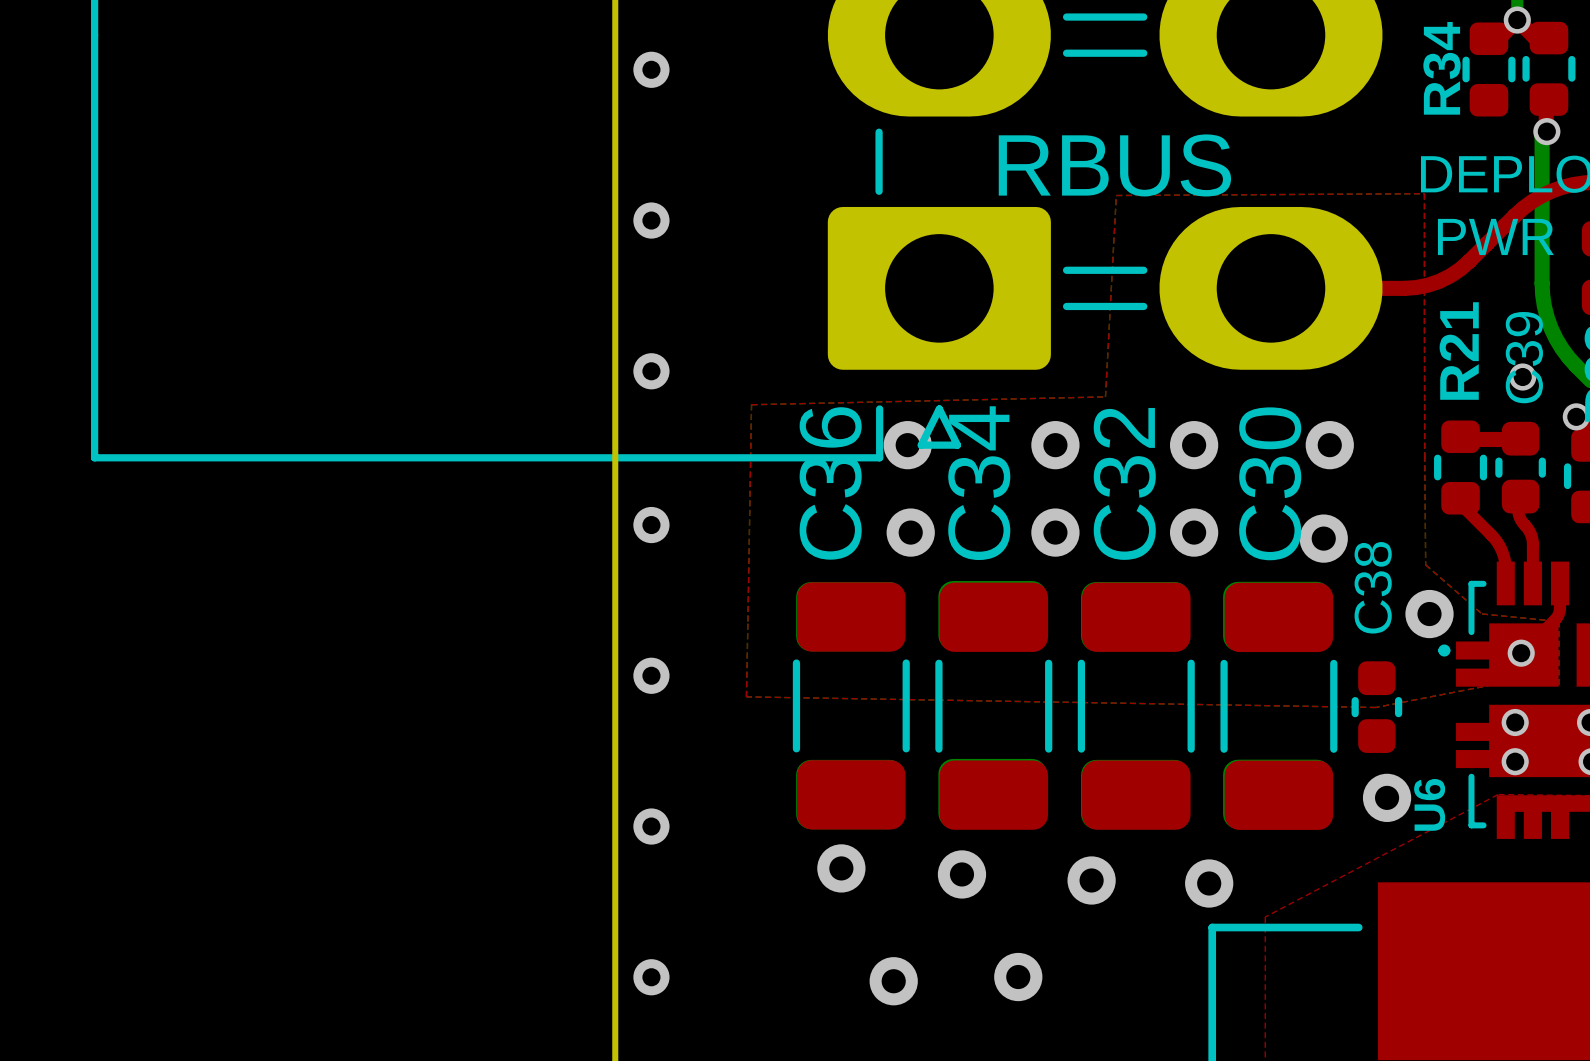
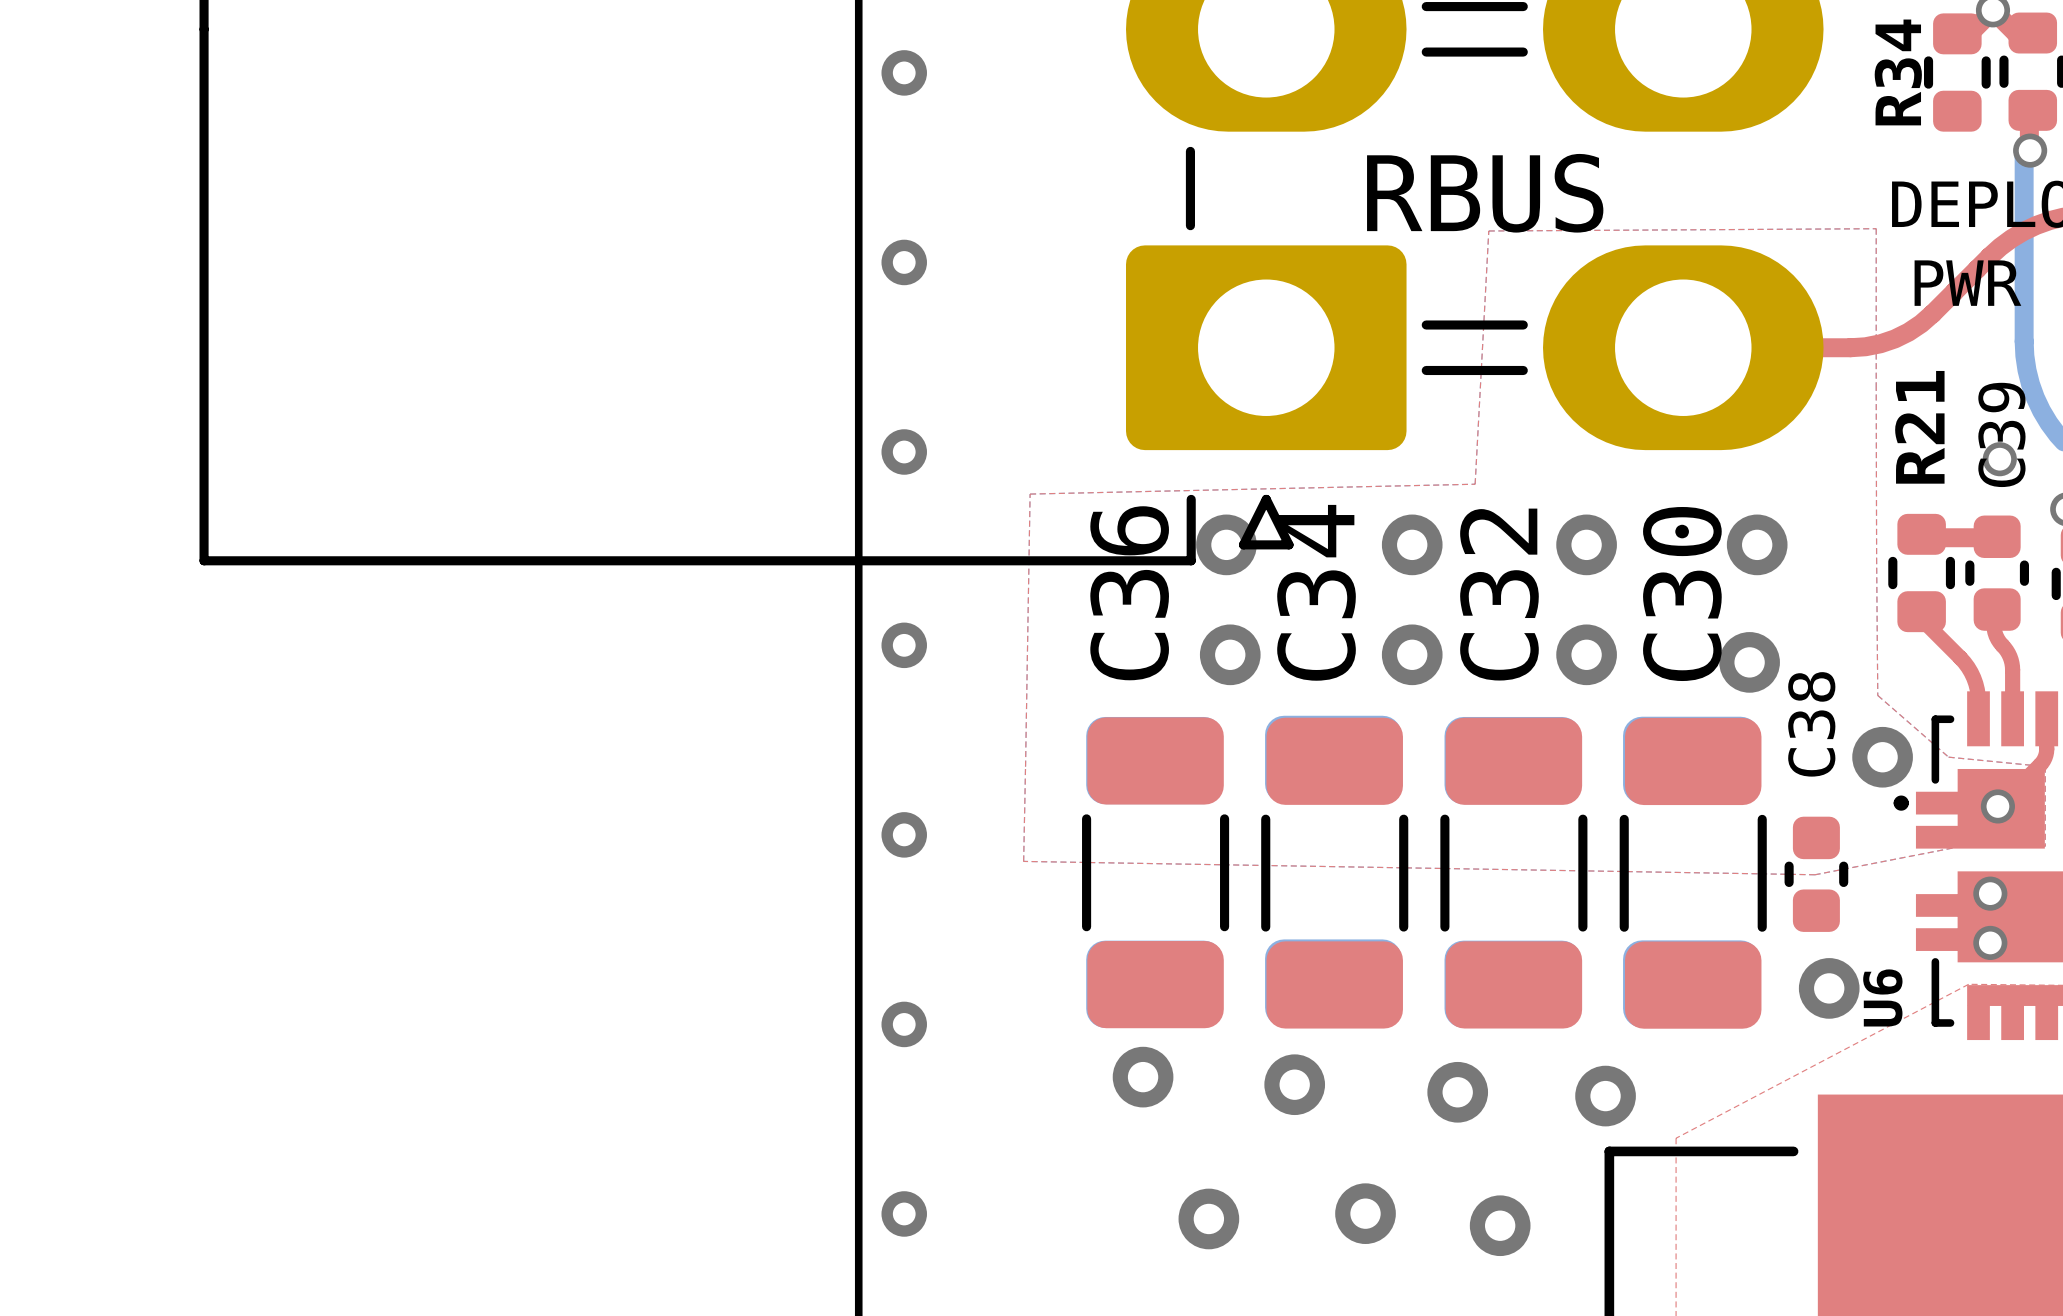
via: none -> (1500, 1225)

